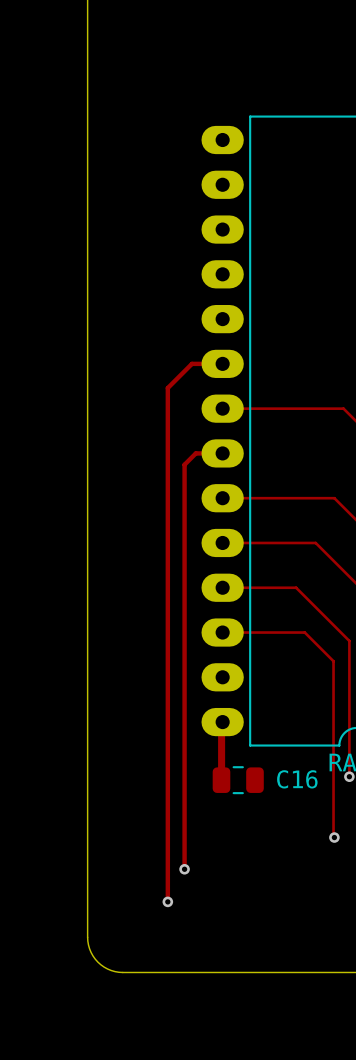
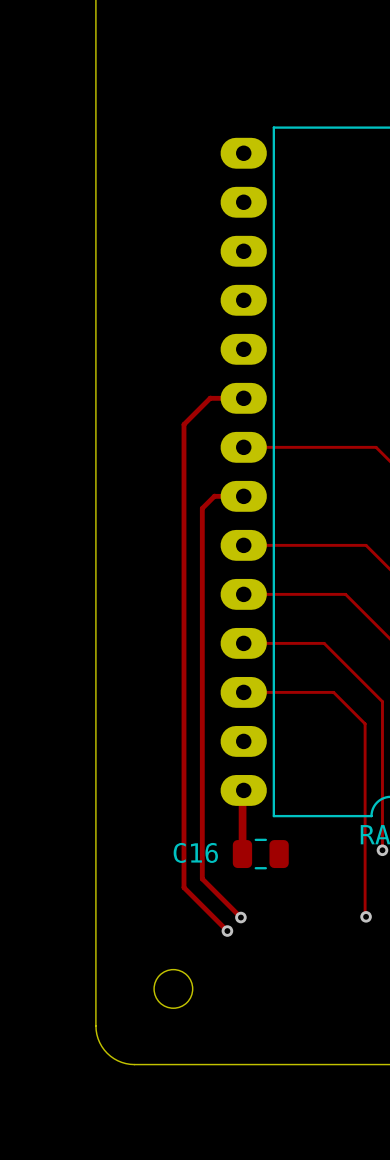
track: (168, 387) (167, 901) -> (183, 424) (183, 887) (227, 931)
track: (184, 464) (184, 869) -> (202, 508) (202, 878) (240, 917)
C16 name position: C16 (297, 779) -> C16 (195, 852)
via: none -> (240, 917)
via: none -> (227, 931)
via: (184, 869) -> none
round board edge: none -> [153, 969, 194, 1009]
via: (167, 901) -> none

